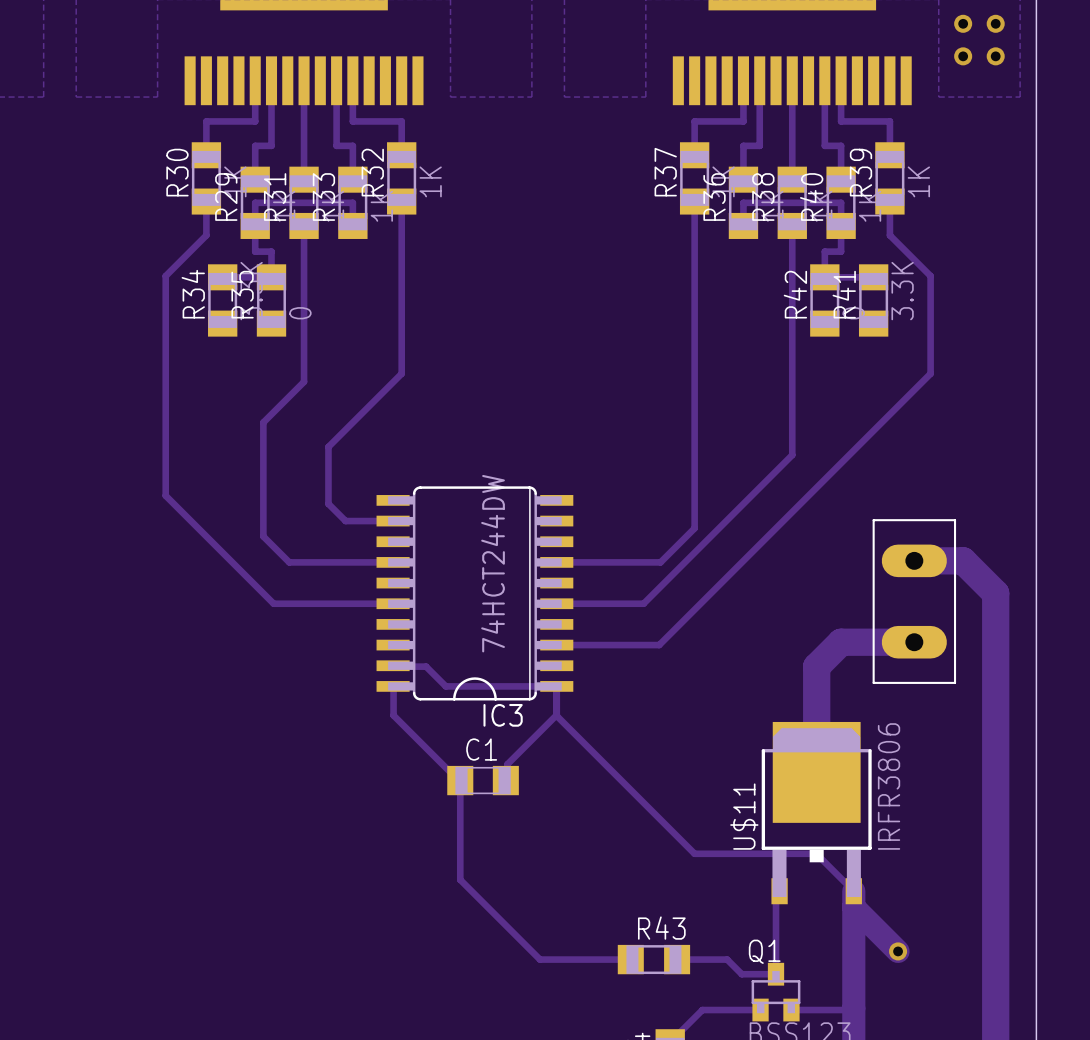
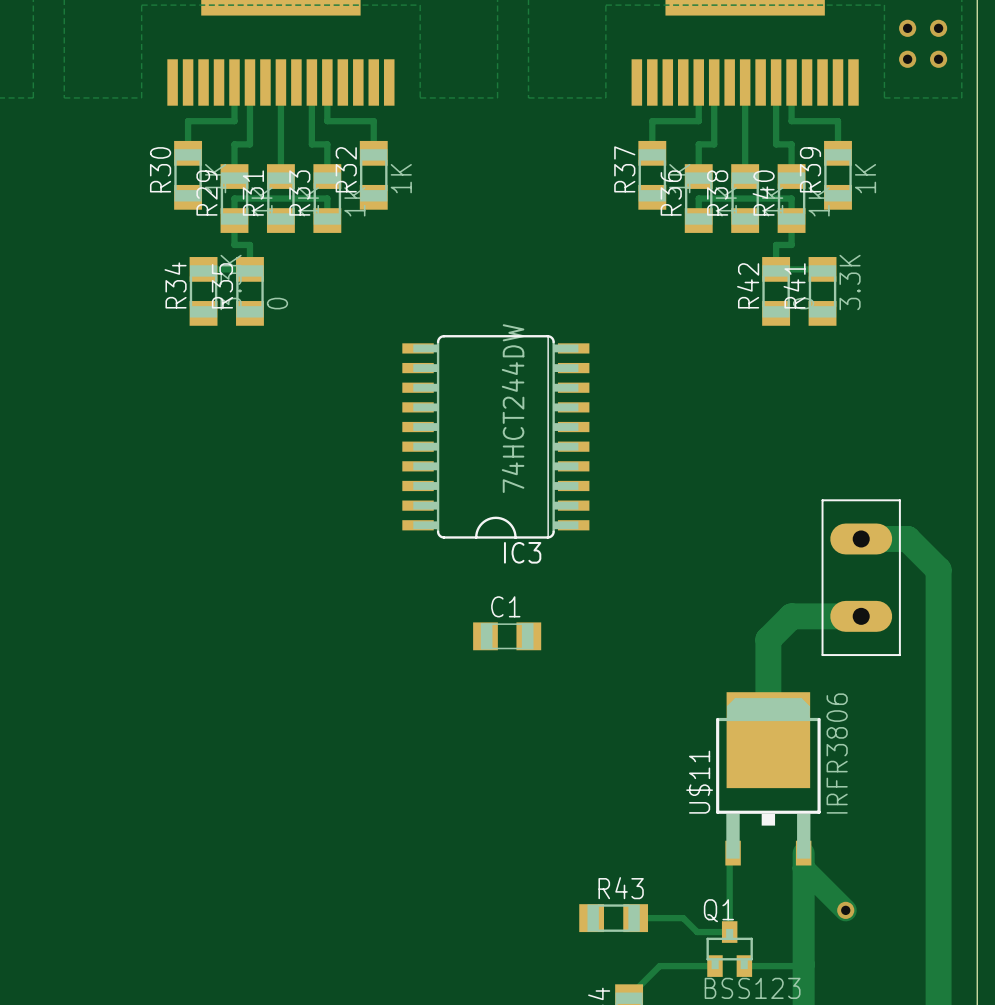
track: (206, 201) (206, 235) (165, 276) (165, 495) (273, 603) (393, 603) -> none
track: (401, 201) (401, 373) (328, 446) (328, 503) (345, 521) (393, 521) -> none
track: (694, 201) (694, 528) (660, 562) (556, 562) -> none
track: (889, 201) (889, 235) (930, 276) (930, 373) (659, 645) (556, 645) -> none
track: (304, 225) (304, 381) (263, 422) (263, 536) (289, 562) (393, 562) -> none
track: (792, 225) (792, 455) (643, 603) (556, 603) -> none
IC3 position: (474, 593) -> (495, 436)
track: (393, 665) (426, 666) (445, 686) (556, 686) -> none
track: (393, 686) (393, 715) (460, 780) (460, 879) (540, 959) (630, 959) -> none
track: (556, 686) (556, 715) (507, 764) (507, 788) (505, 780) -> none
track: (556, 686) (556, 715) (694, 853) (816, 853) (853, 891) -> none
C1 position: (483, 780) -> (507, 636)

